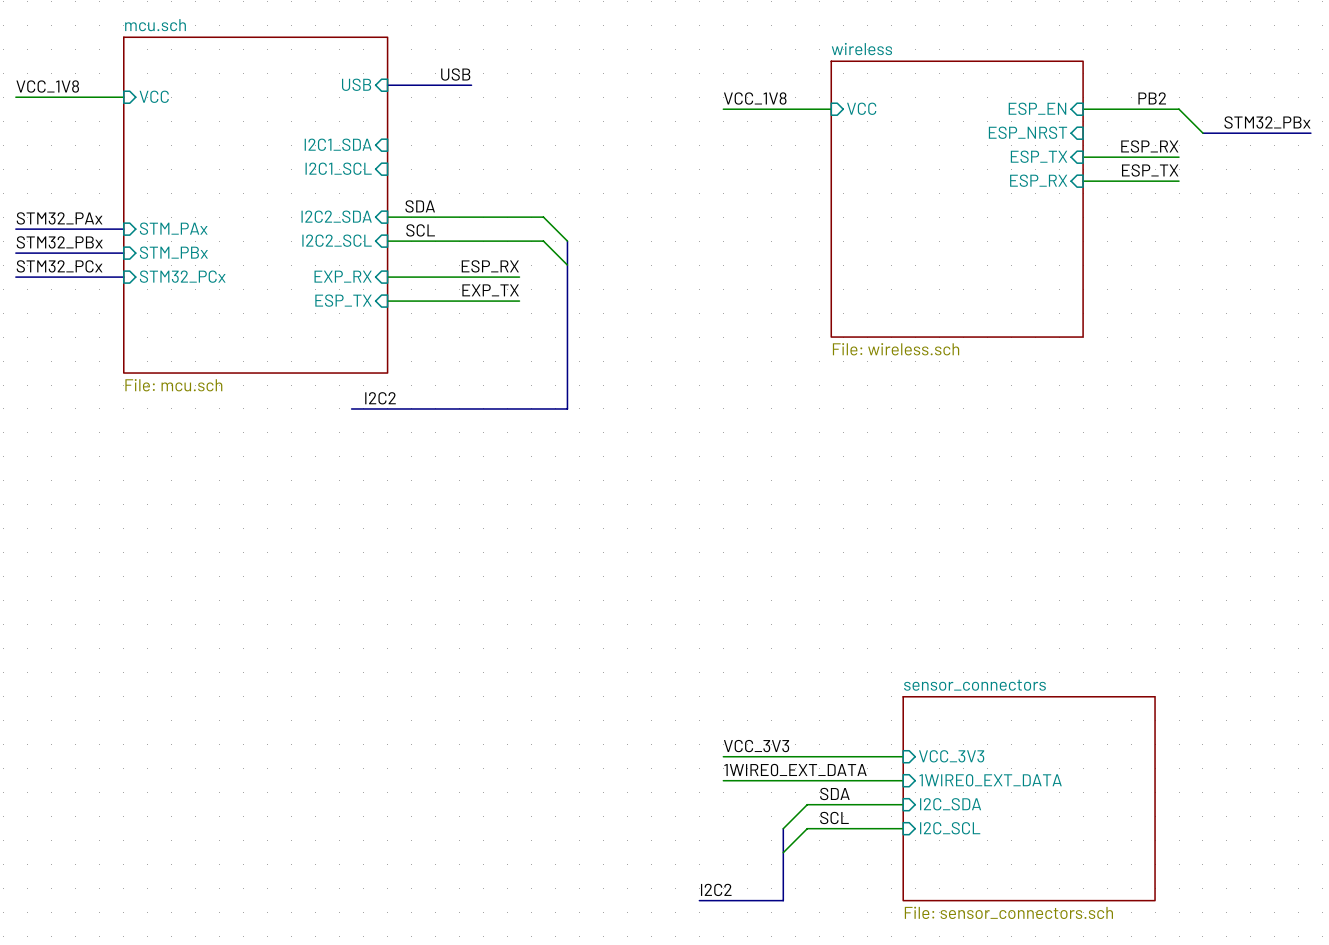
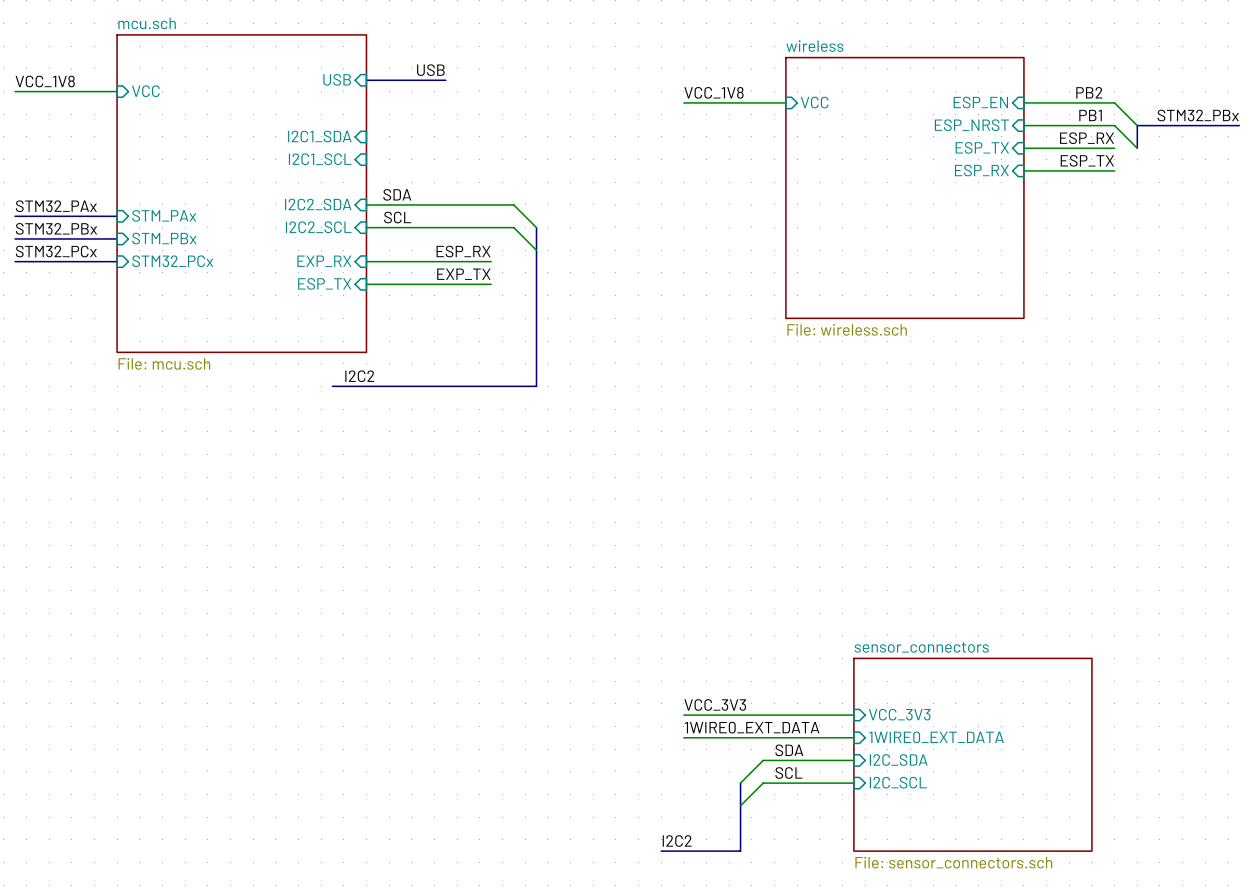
label: none -> PB1 (1090, 115)
wire: none -> (1023, 125) (1114, 125) (1137, 148)
bus: none -> (1137, 125) (1137, 148)

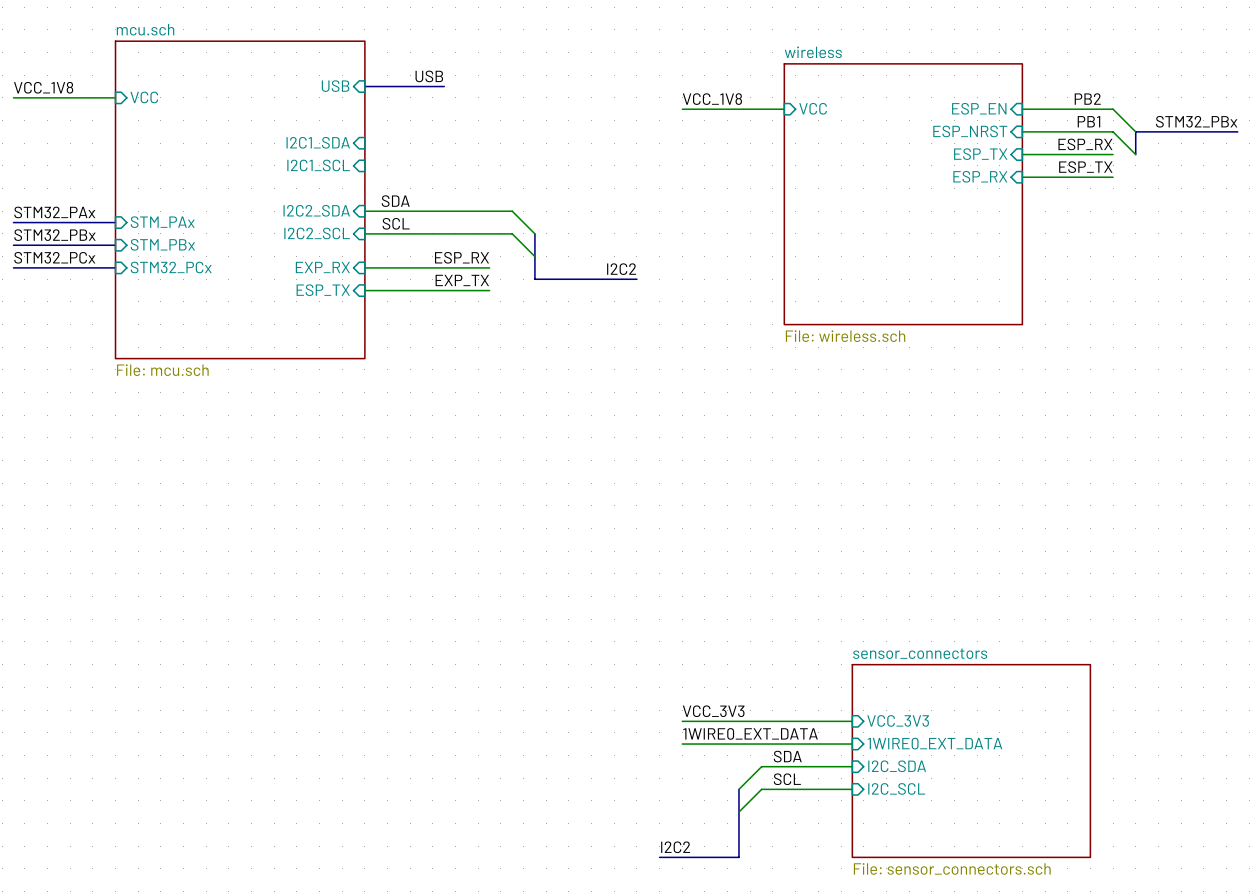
label: none -> I2C2 (621, 269)
bus: (536, 272) (536, 386) (332, 386) -> (534, 279) (636, 279)
label: I2C2 (359, 376) -> none

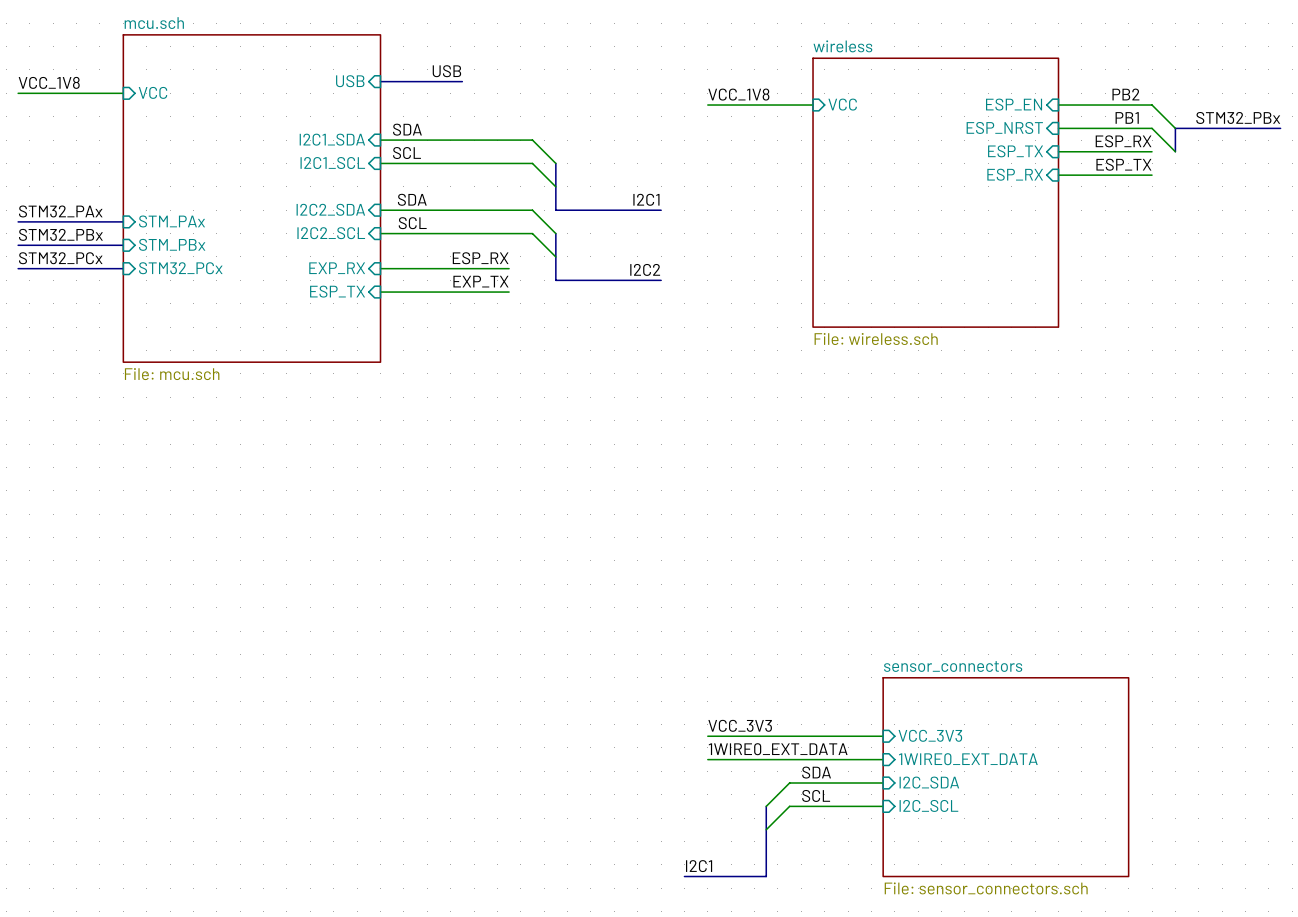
label: none -> SDA (407, 129)
wire: none -> (380, 140) (532, 140) (555, 163)
label: none -> SCL (407, 153)
wire: none -> (380, 163) (532, 163) (555, 186)
bus: none -> (555, 163) (555, 210) (661, 210)
label: none -> I2C1 (646, 199)
label: I2C2 (675, 847) -> I2C1 (699, 866)

